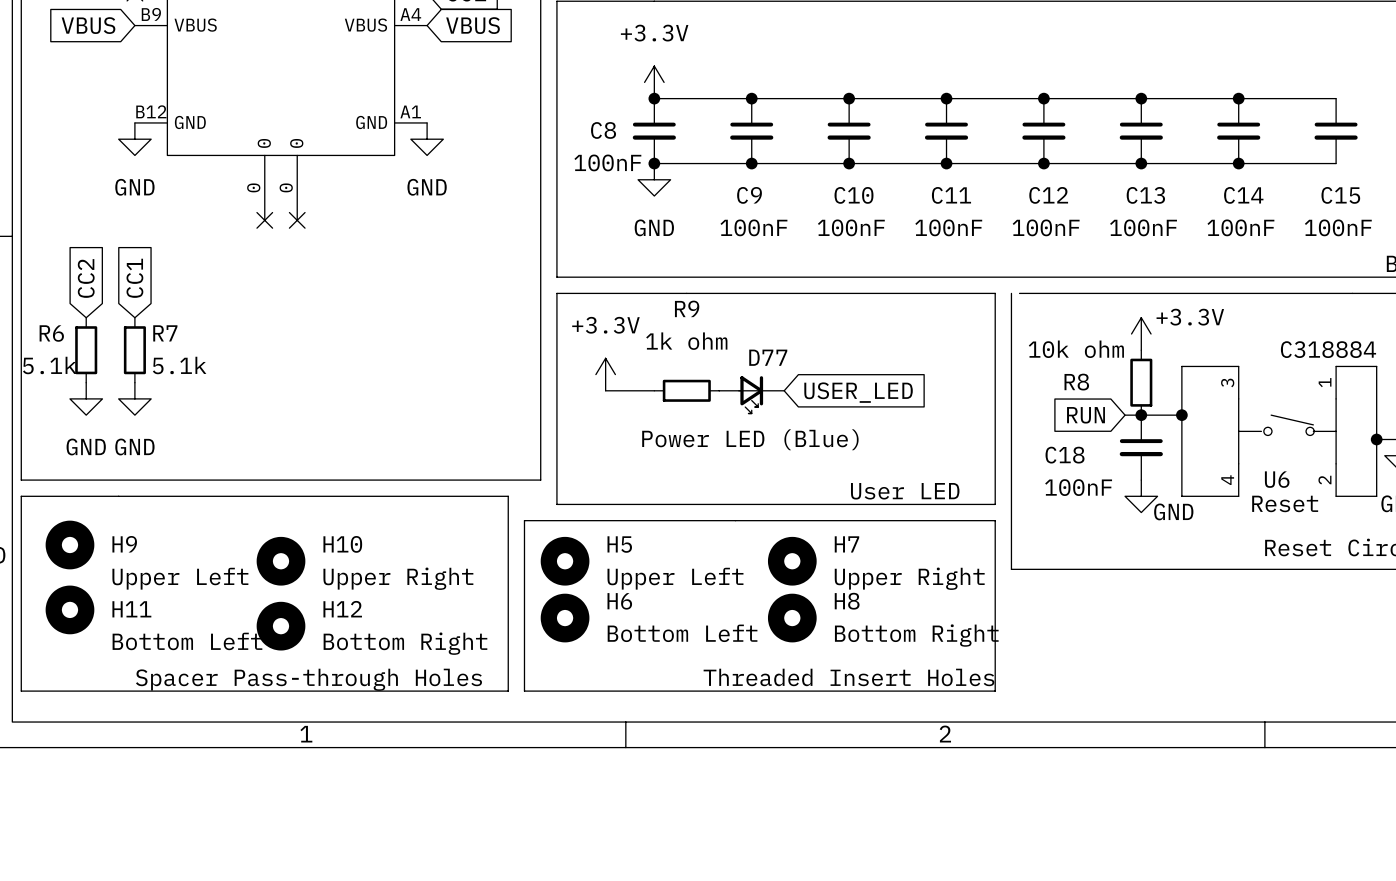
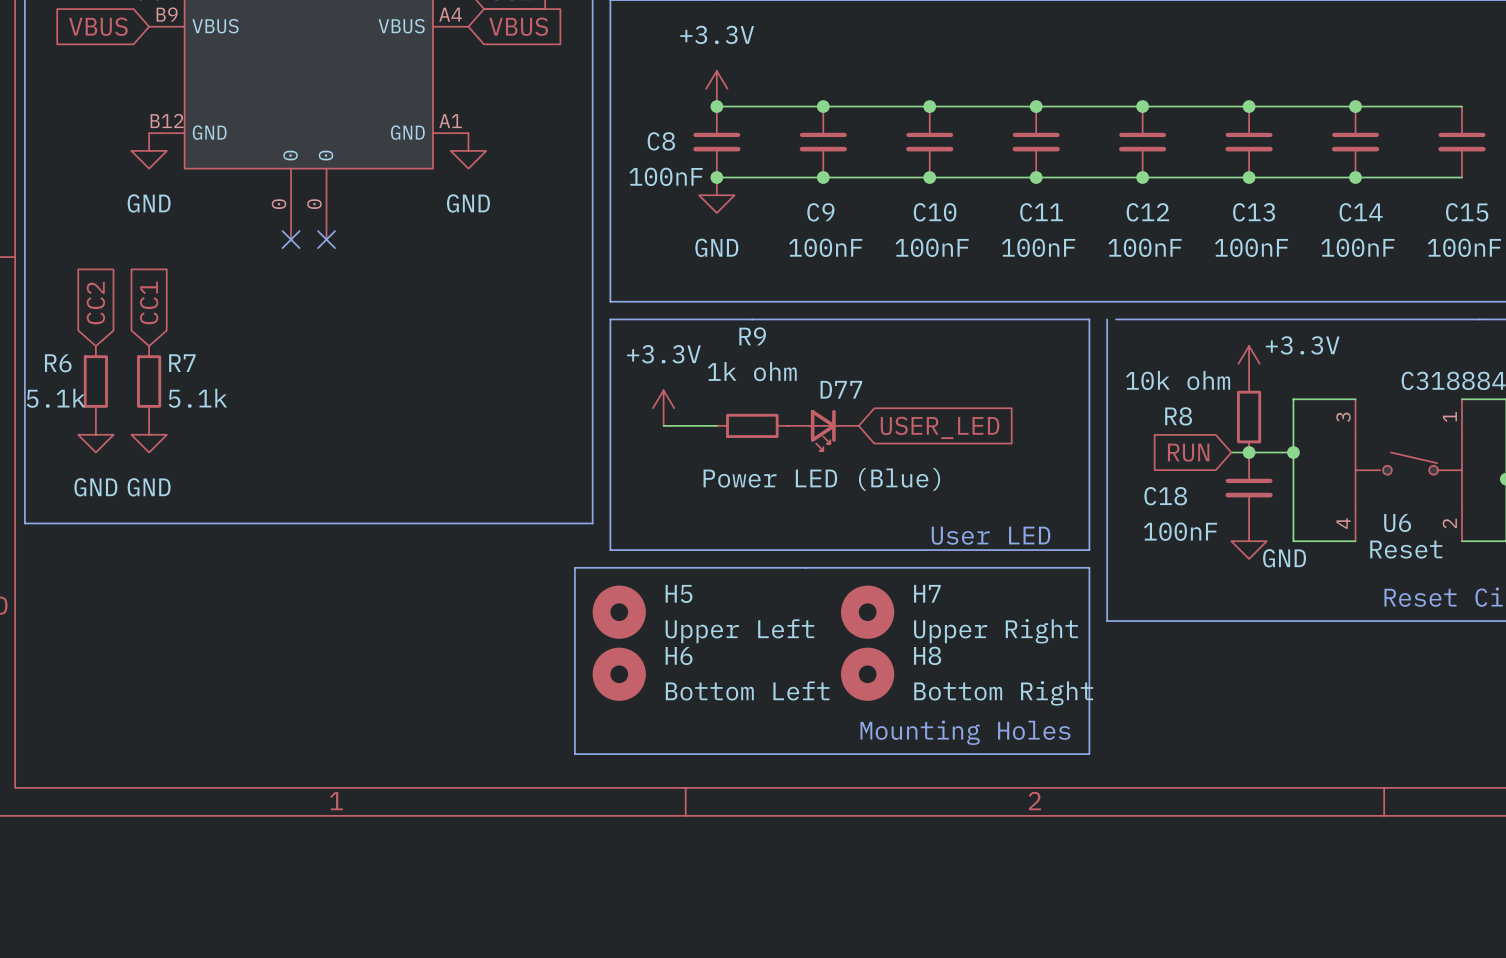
line: (21, 496) (508, 496) (508, 691) (21, 691) (21, 496) -> none
H9: Upper Left (69, 545) -> none
H10: Upper Right (281, 561) -> none
H11: Bottom Left (69, 609) -> none
H12: Bottom Right (281, 626) -> none
text: none -> Mounting Holes (965, 732)
text: Threaded Insert Holes (848, 677) -> none
text: Spacer Pass-through Holes (308, 679) -> none

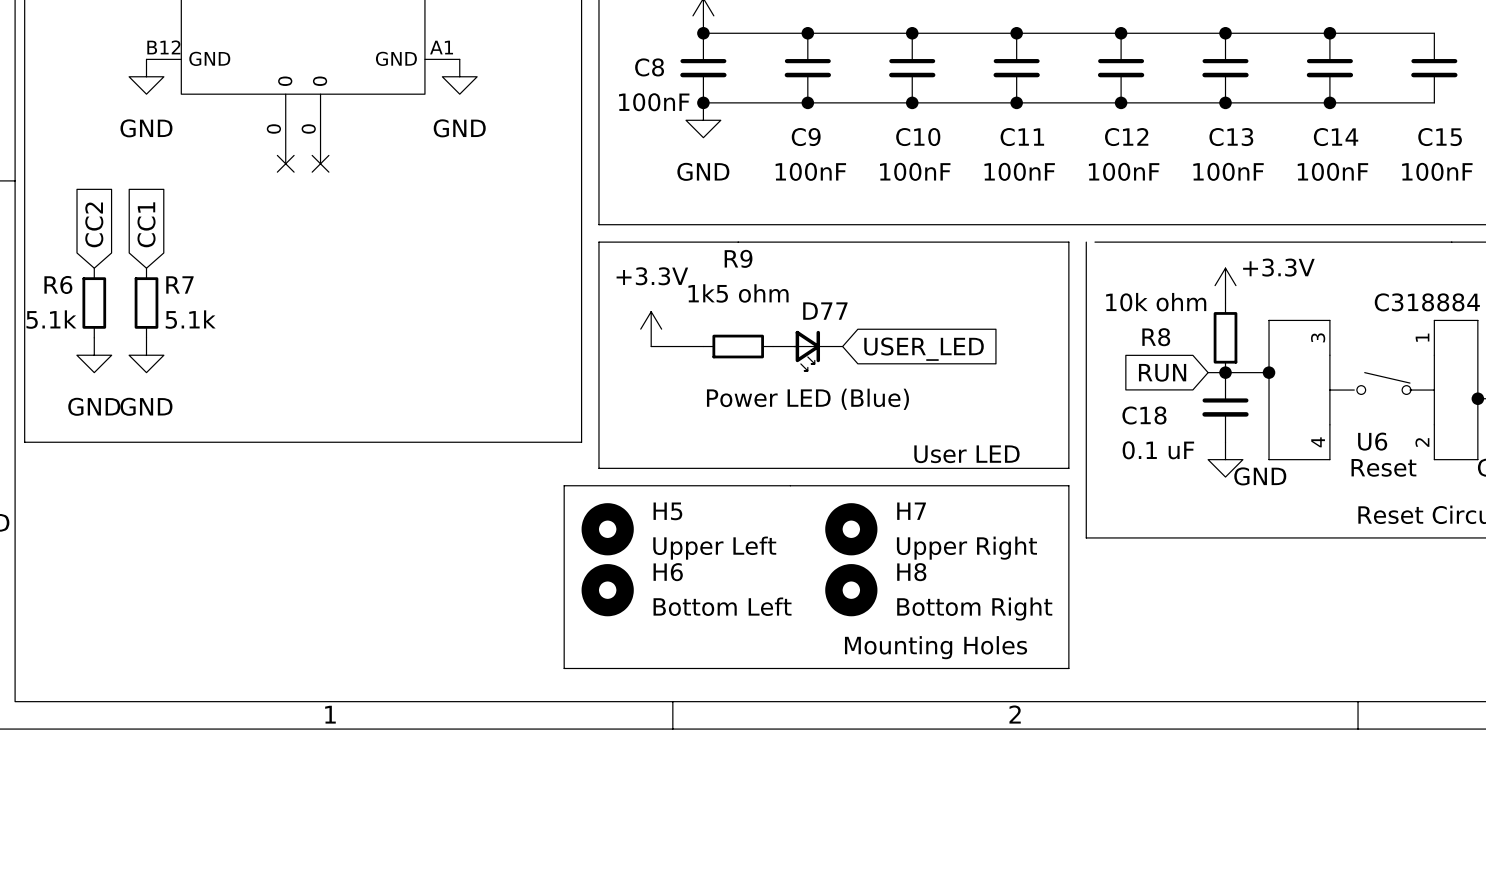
R9 value: 1k ohm (752, 371) -> 1k5 ohm (738, 293)
C18 value: 100nF (1180, 531) -> 0.1 uF (1158, 450)

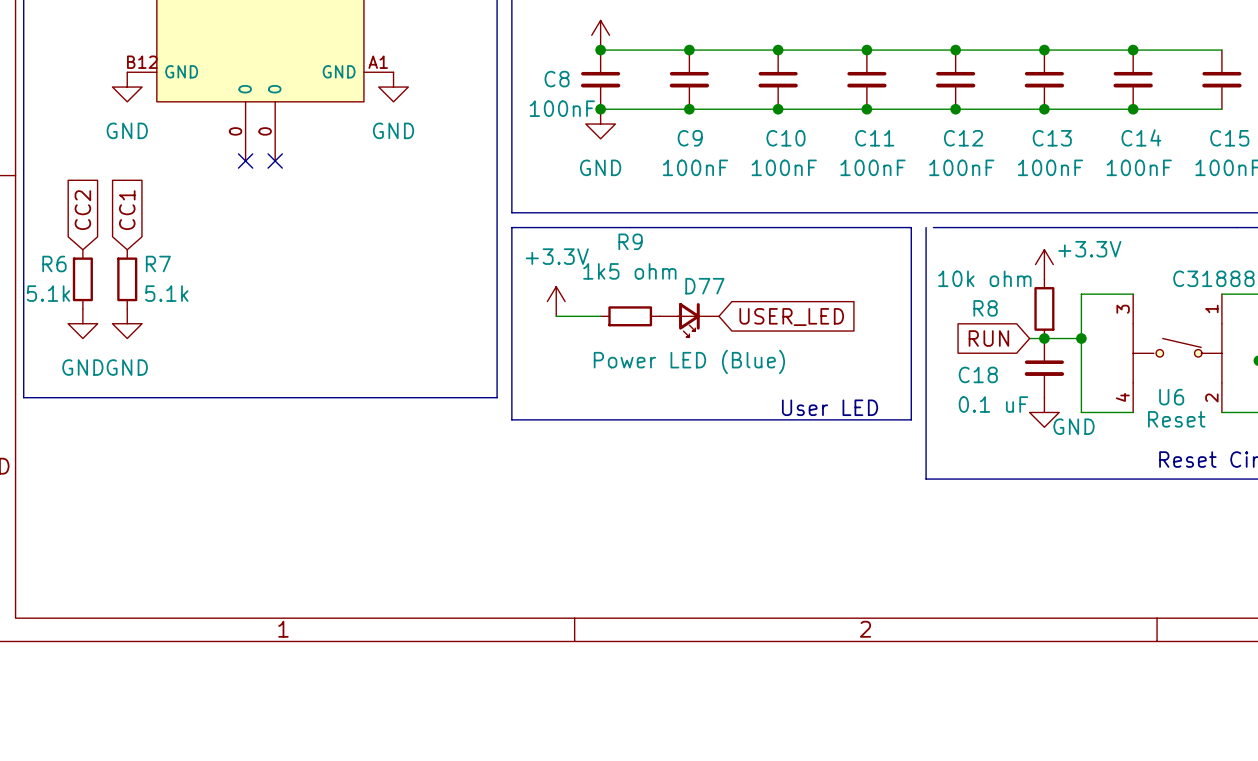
line: (564, 485) (1068, 485) (1068, 668) (564, 668) (564, 485) -> none
H5: Upper Left (607, 529) -> none
H7: Upper Right (851, 529) -> none
H6: Bottom Left (607, 590) -> none
H8: Bottom Right (851, 590) -> none
text: Mounting Holes (936, 647) -> none

